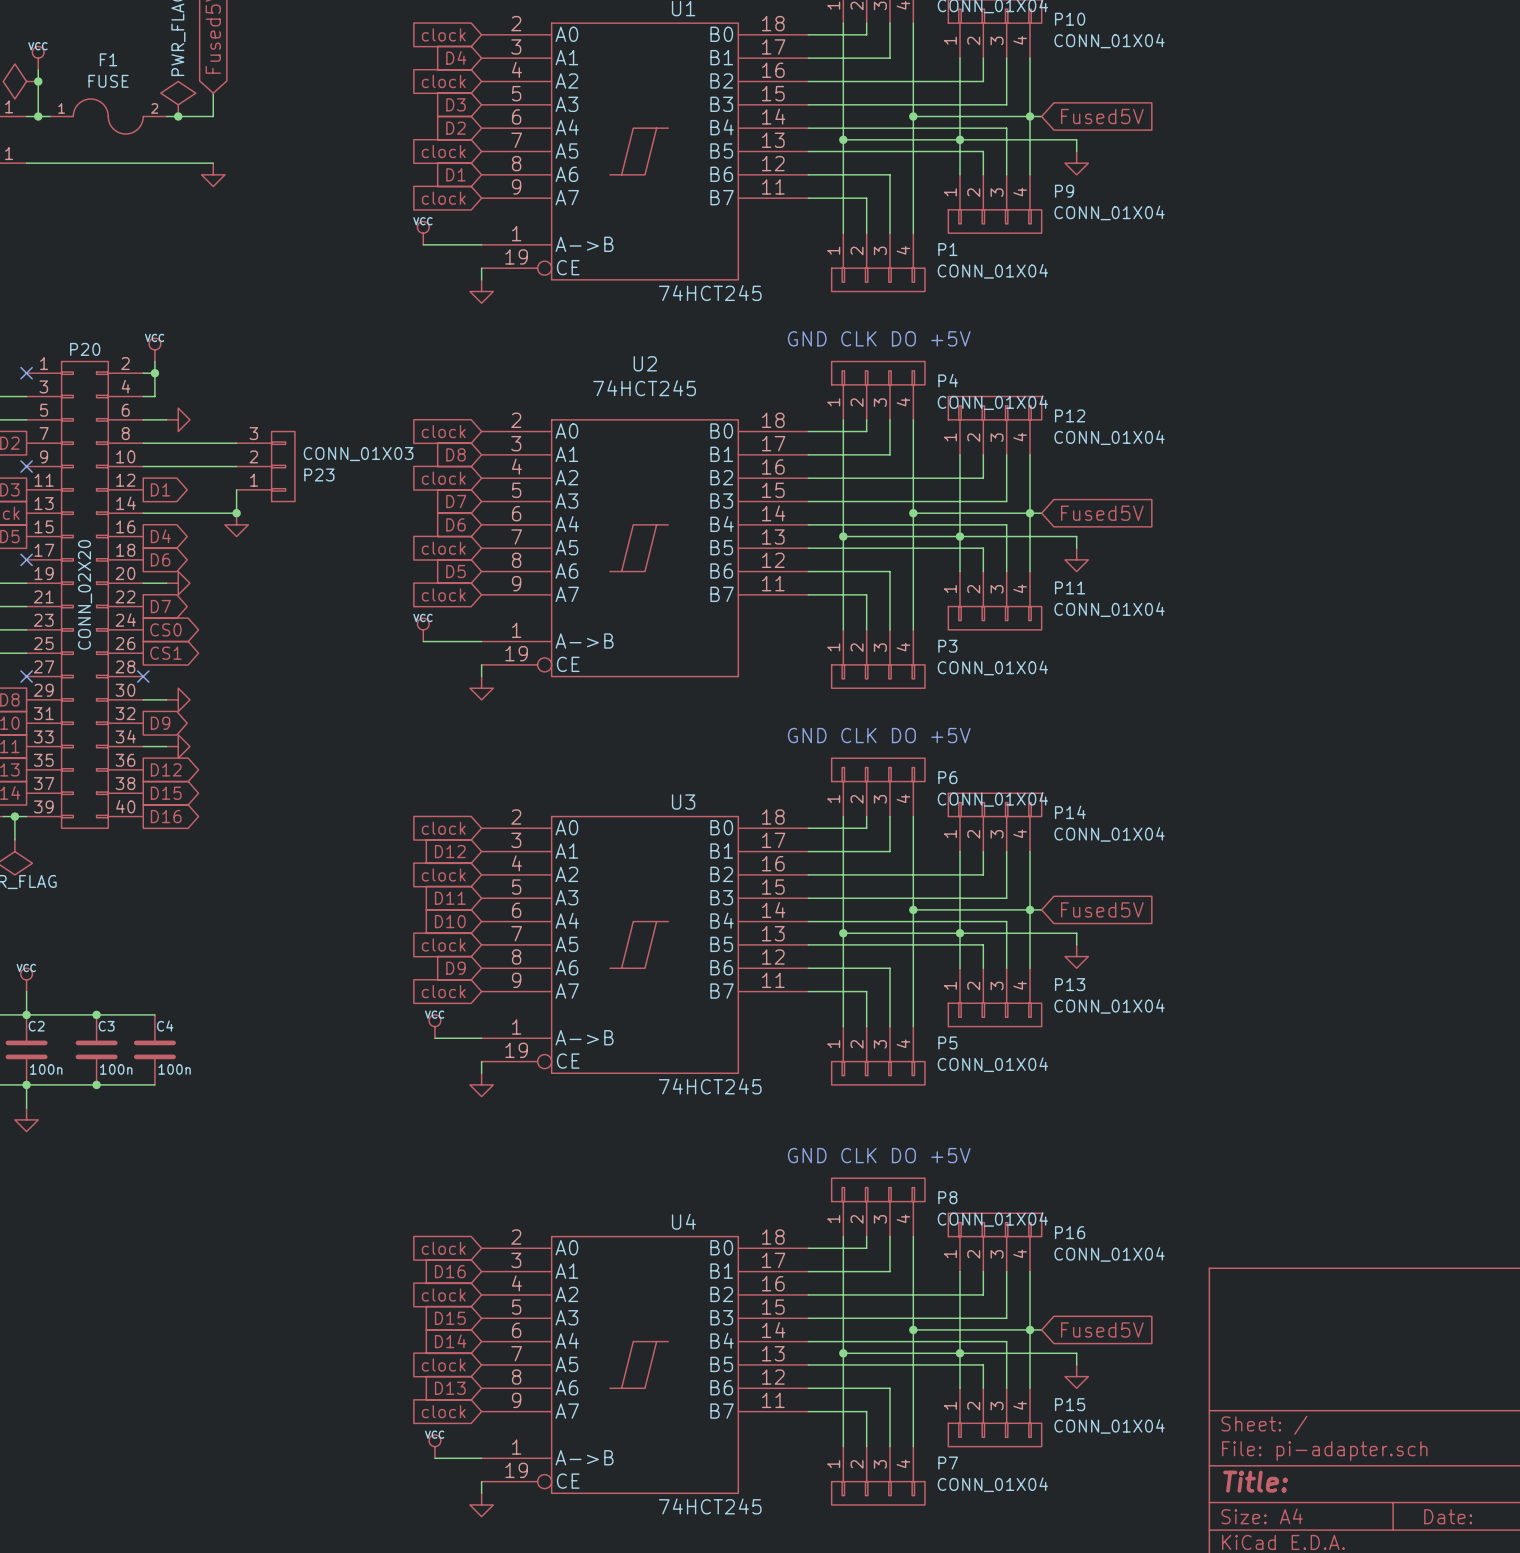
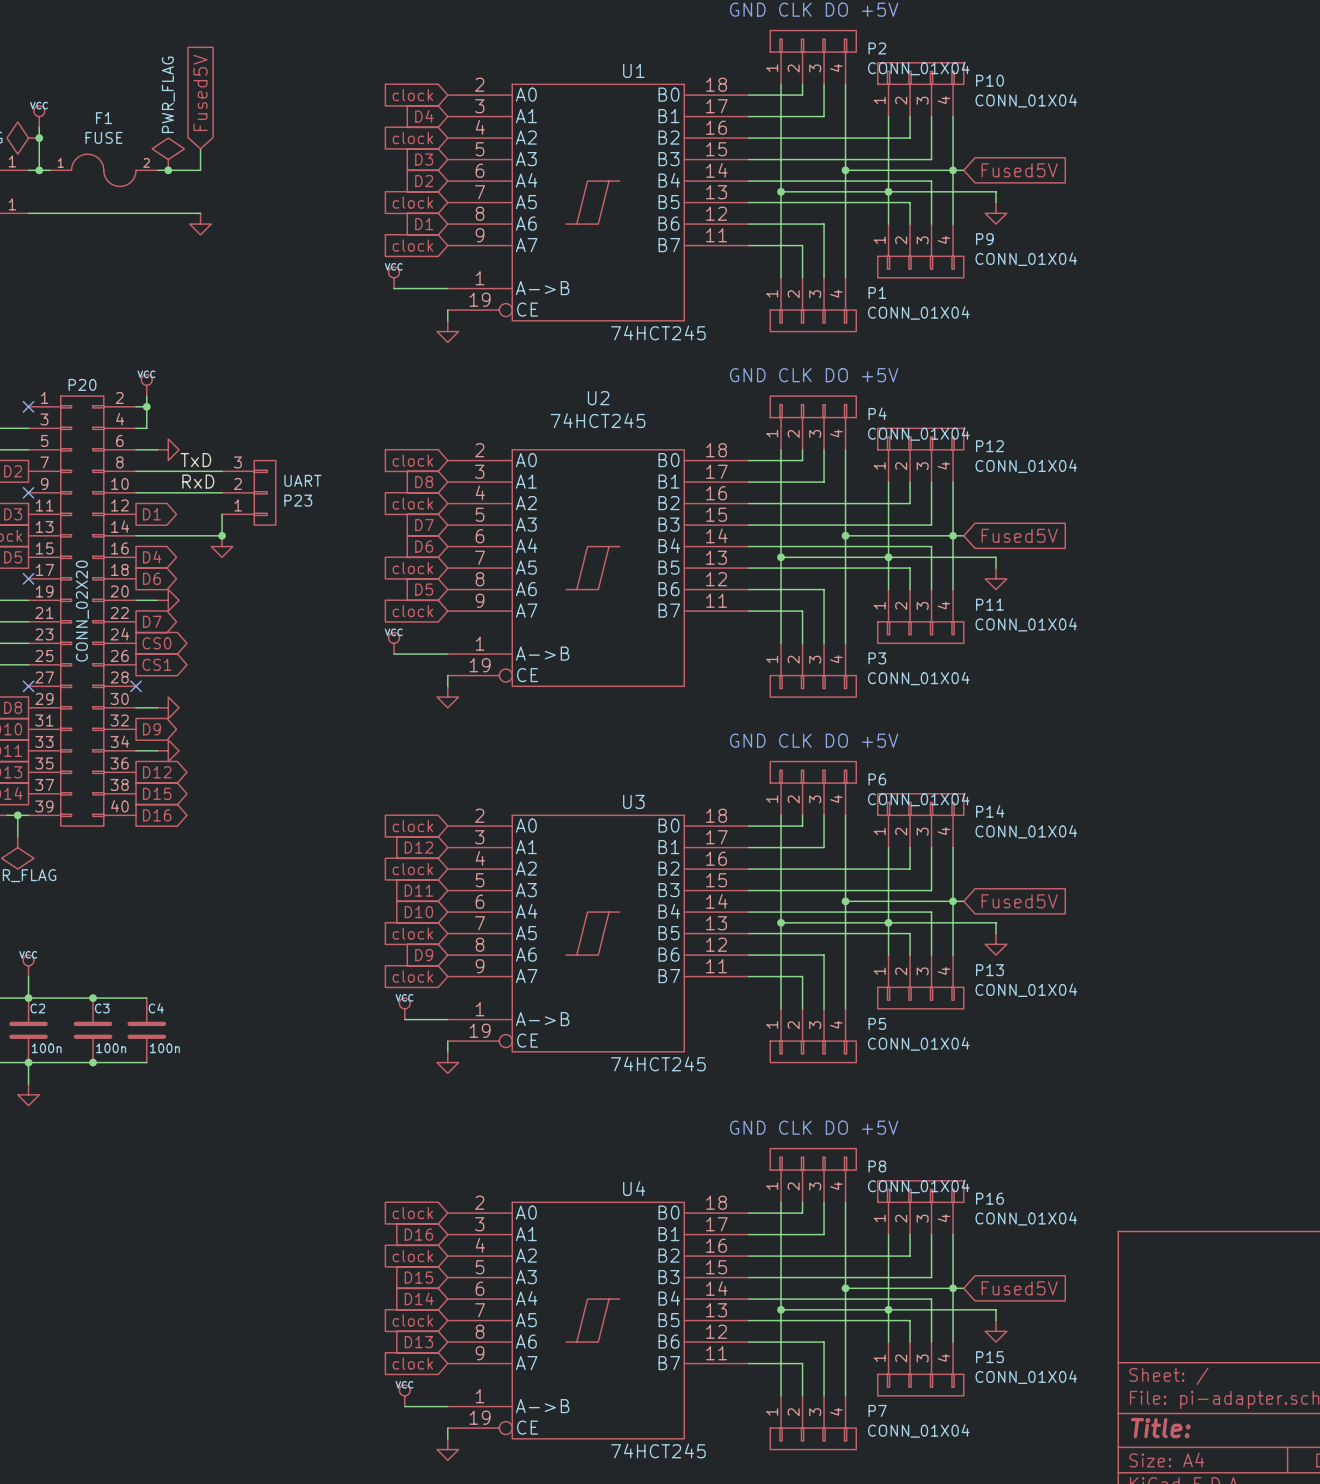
label: none -> TxD (195, 460)
label: none -> RxD (198, 481)
P23 value: CONN_01X03 (358, 454) -> UART (302, 480)

